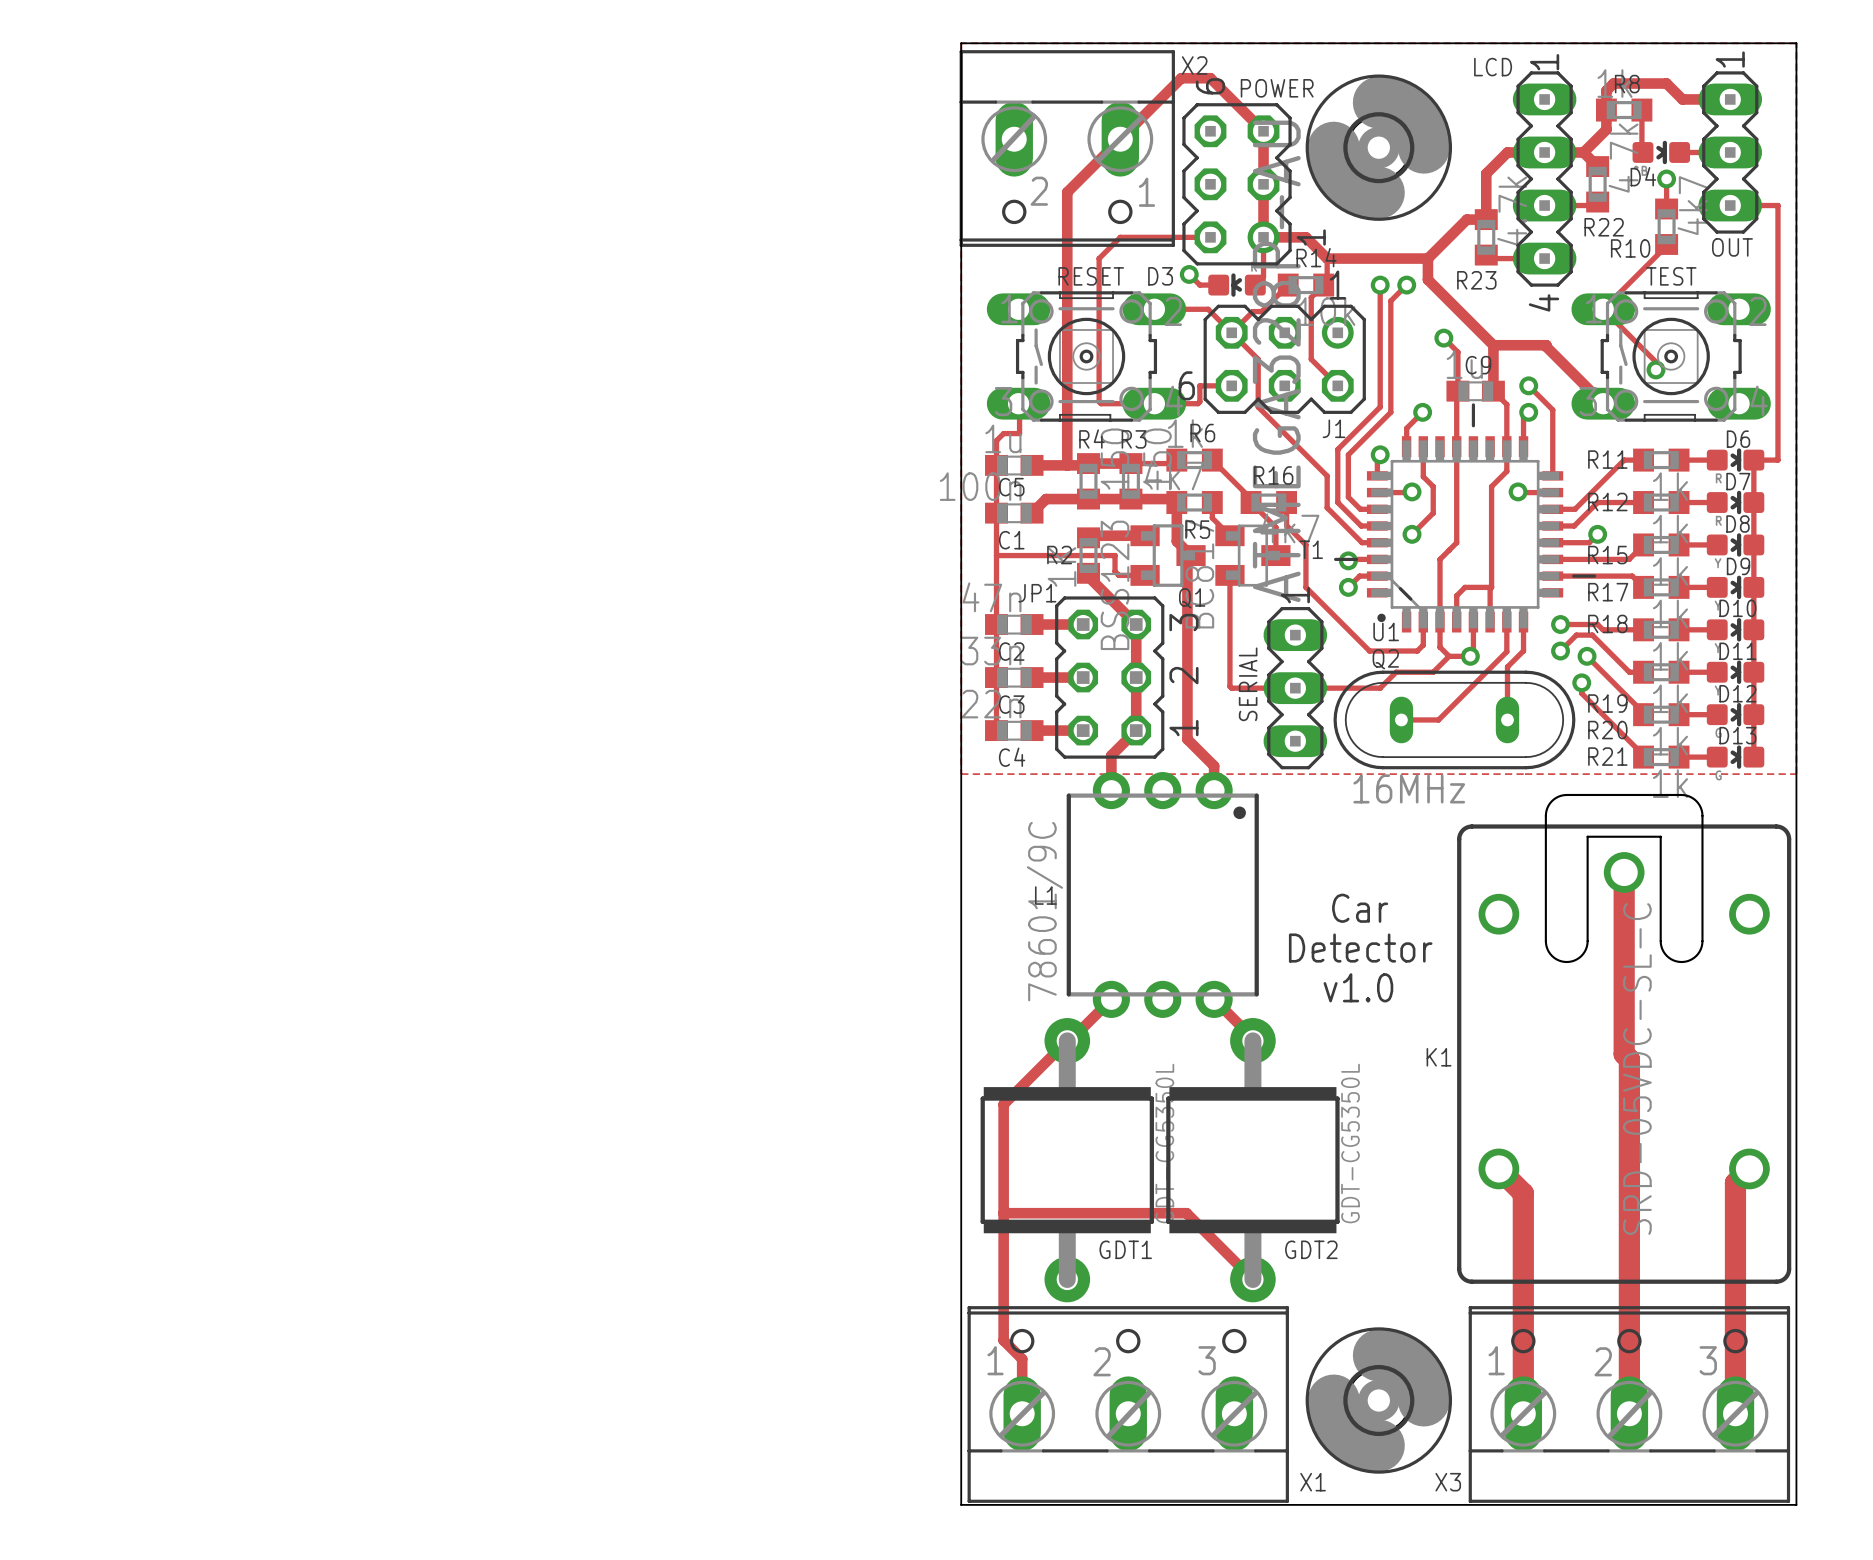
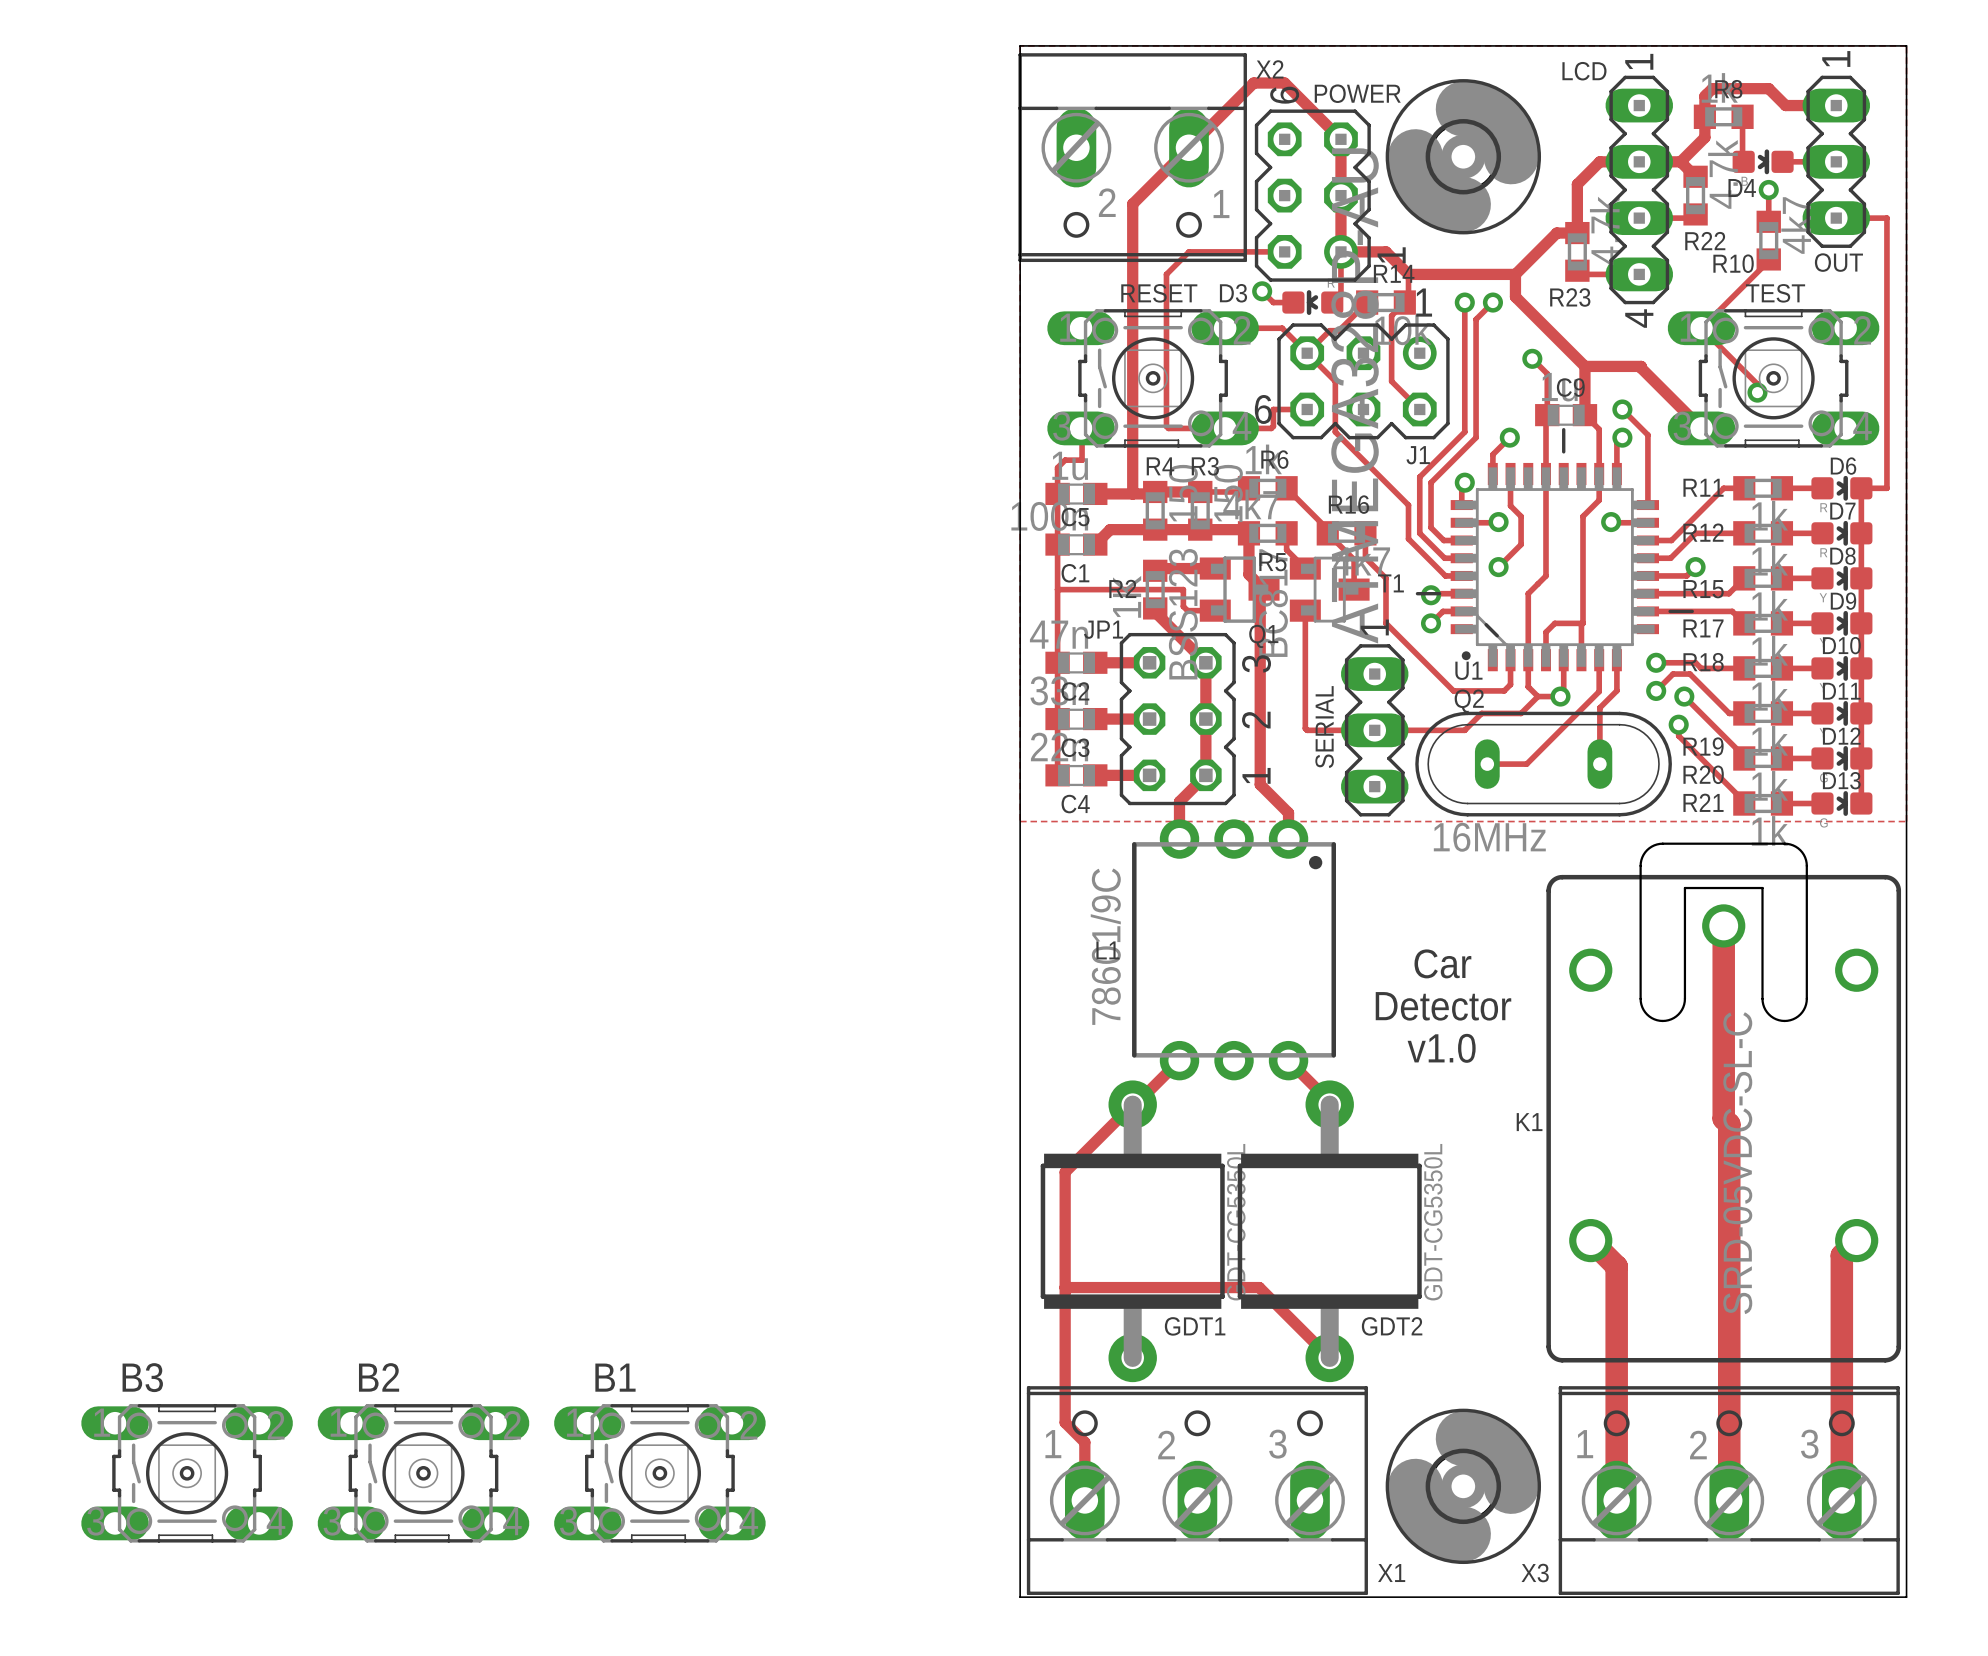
B3: none -> (187, 1473)
B2: none -> (423, 1473)
B1: none -> (659, 1473)

